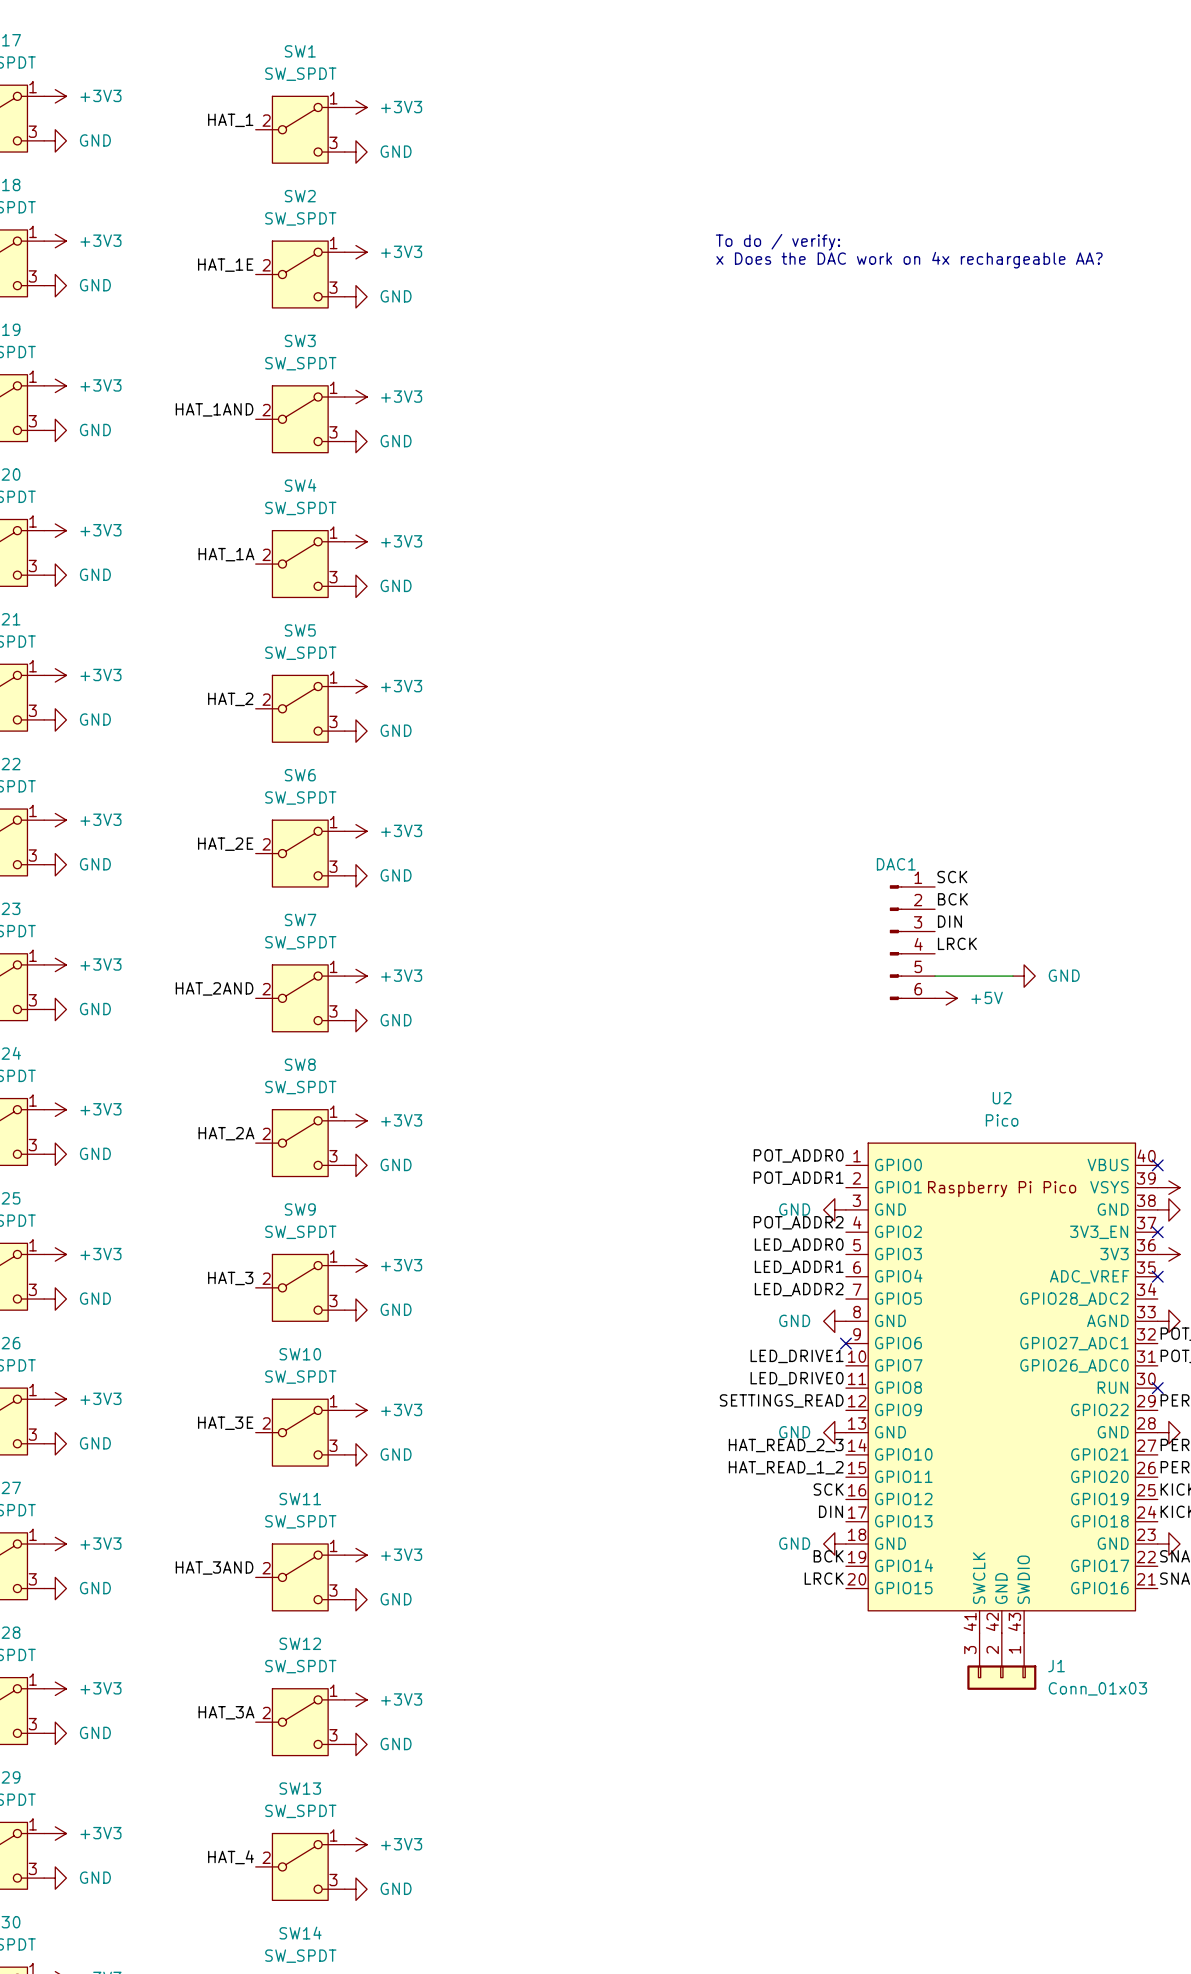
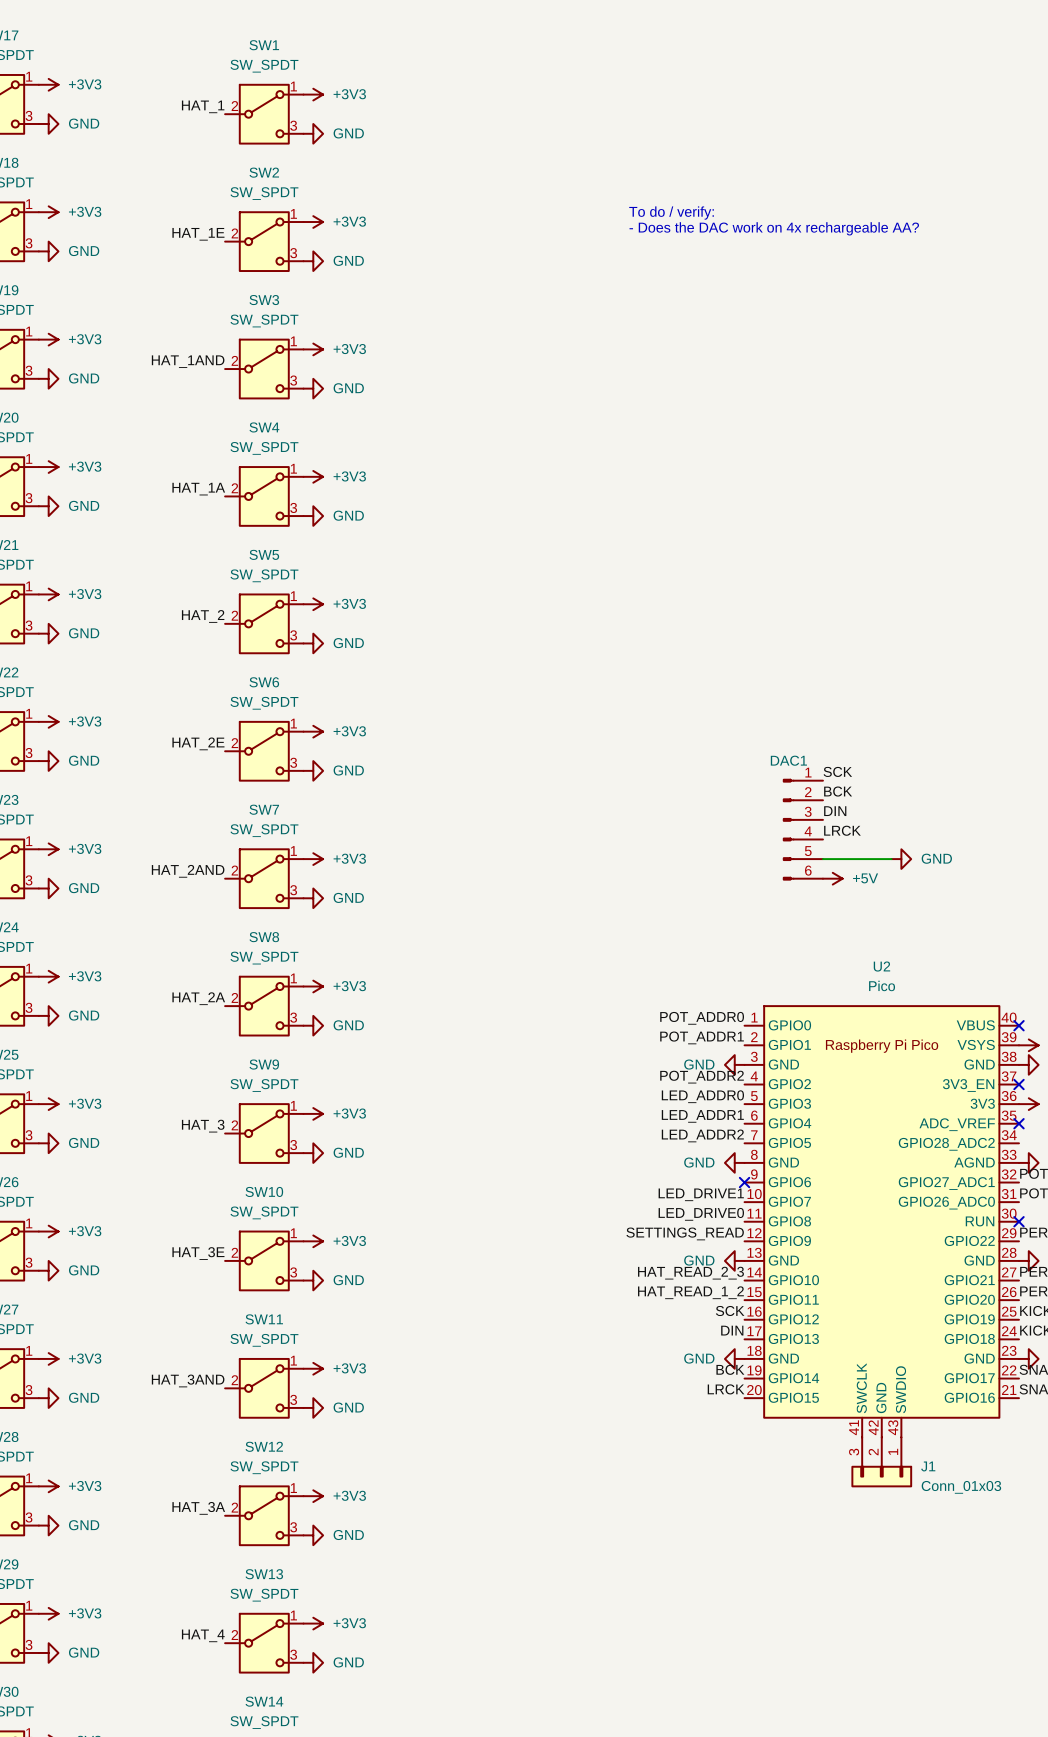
text: x Does the DAC work on 4x rechargeable AA? (909, 260) -> - Does the DAC work on 4x rechargeable AA? (774, 228)

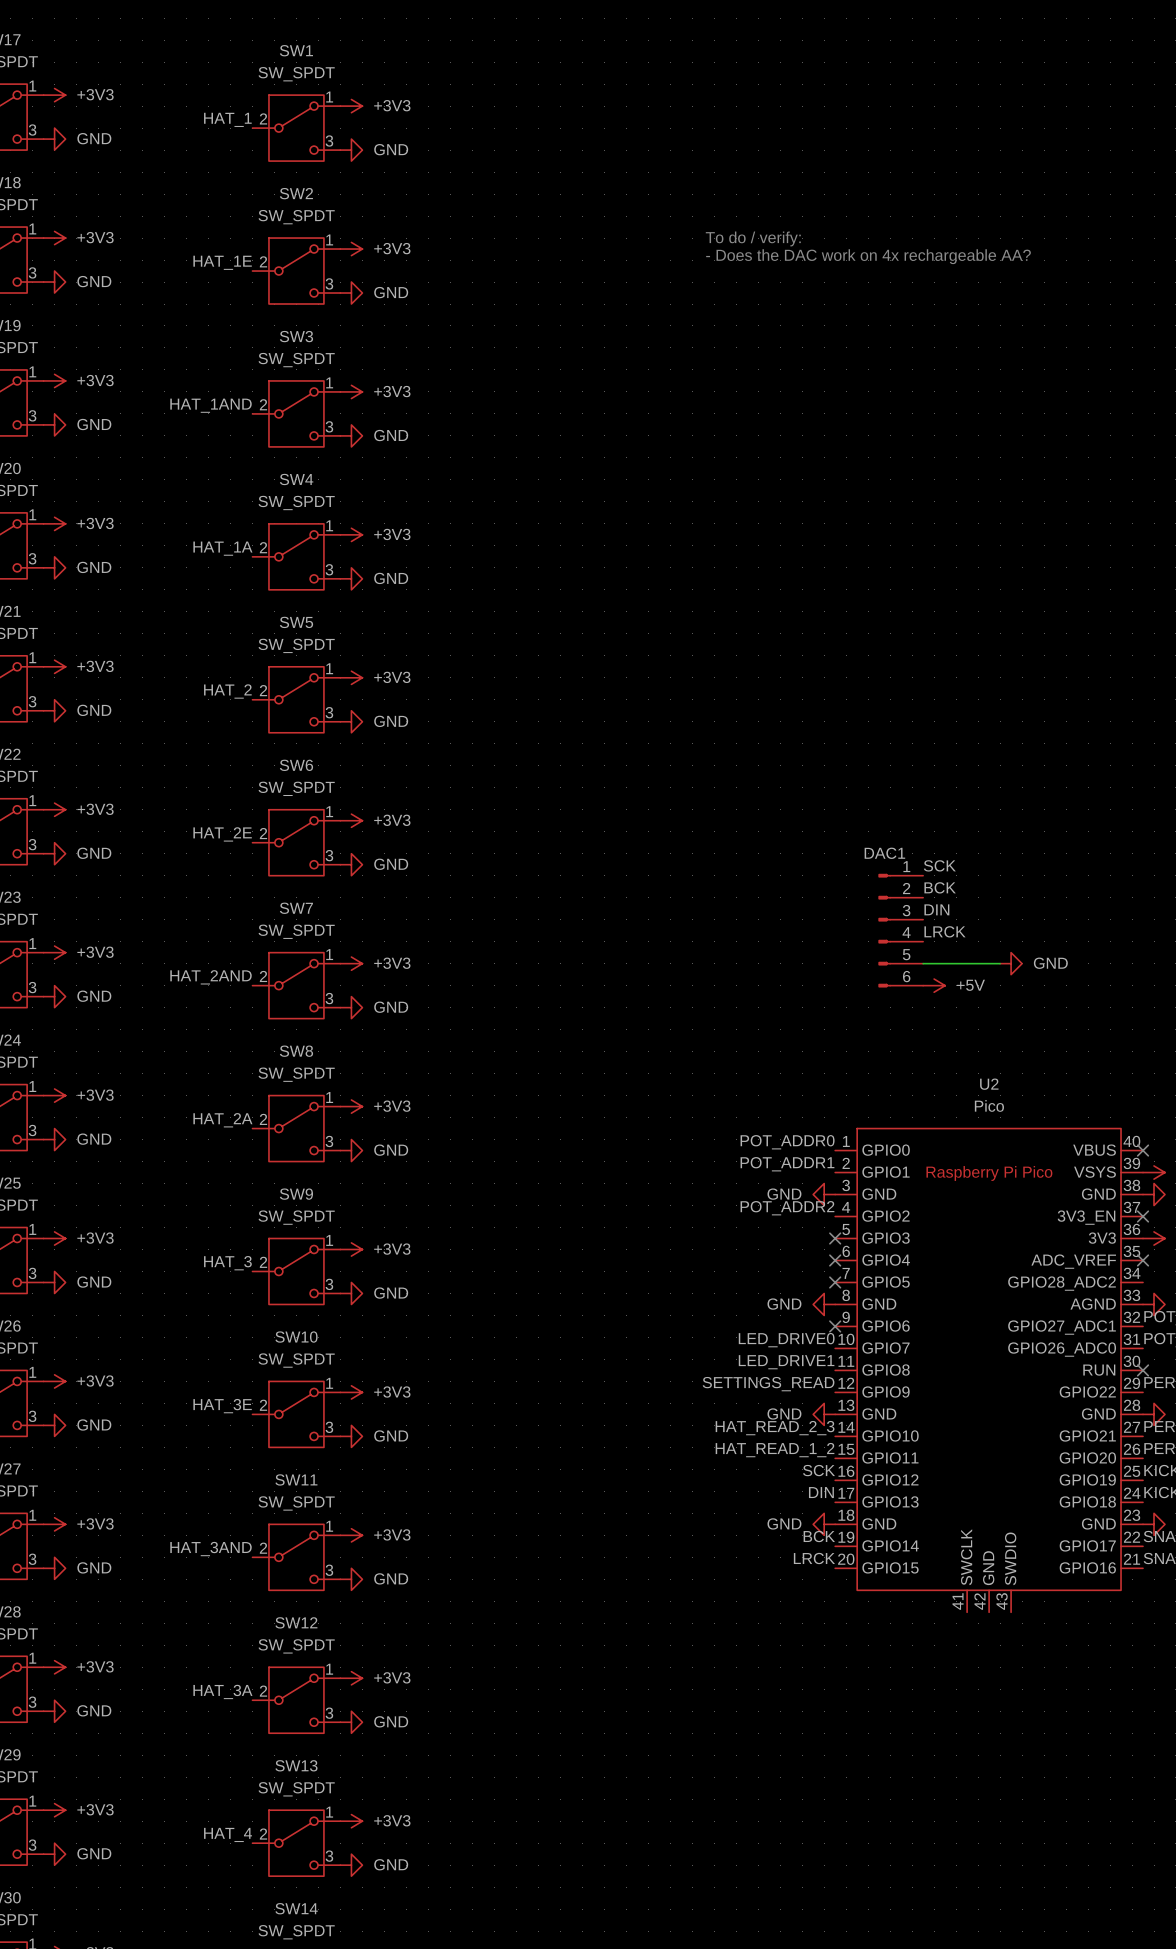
label: LED_ADDR0 (702, 1096) -> none
no-connect mark: none -> (835, 1238)
label: LED_ADDR1 (702, 1116) -> none
no-connect mark: none -> (835, 1260)
label: LED_ADDR2 (702, 1135) -> none
no-connect mark: none -> (835, 1282)
label: LED_DRIVE1 (701, 1194) -> LED_DRIVE0 (786, 1340)
label: LED_DRIVE0 (701, 1214) -> LED_DRIVE1 (786, 1362)
J1: Conn_01x03 (881, 1462) -> none

